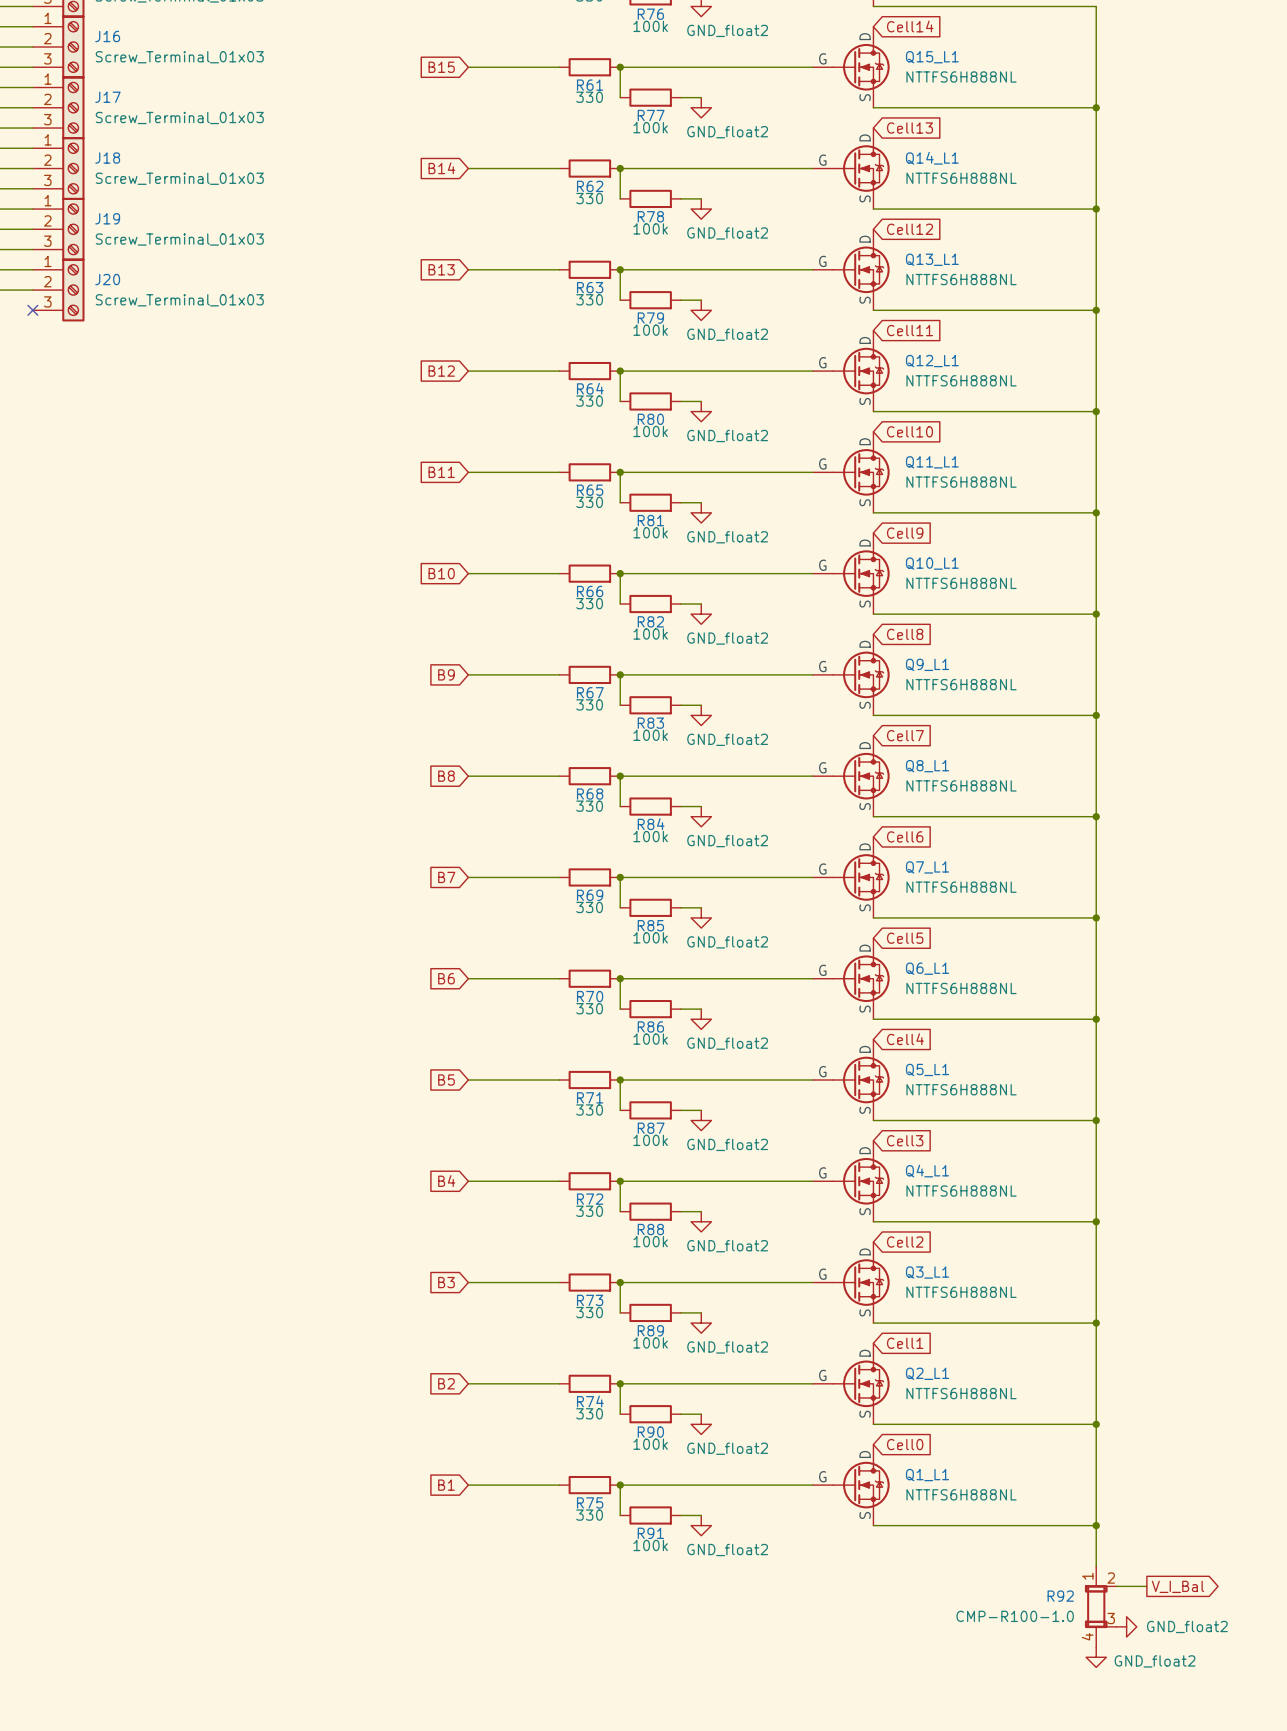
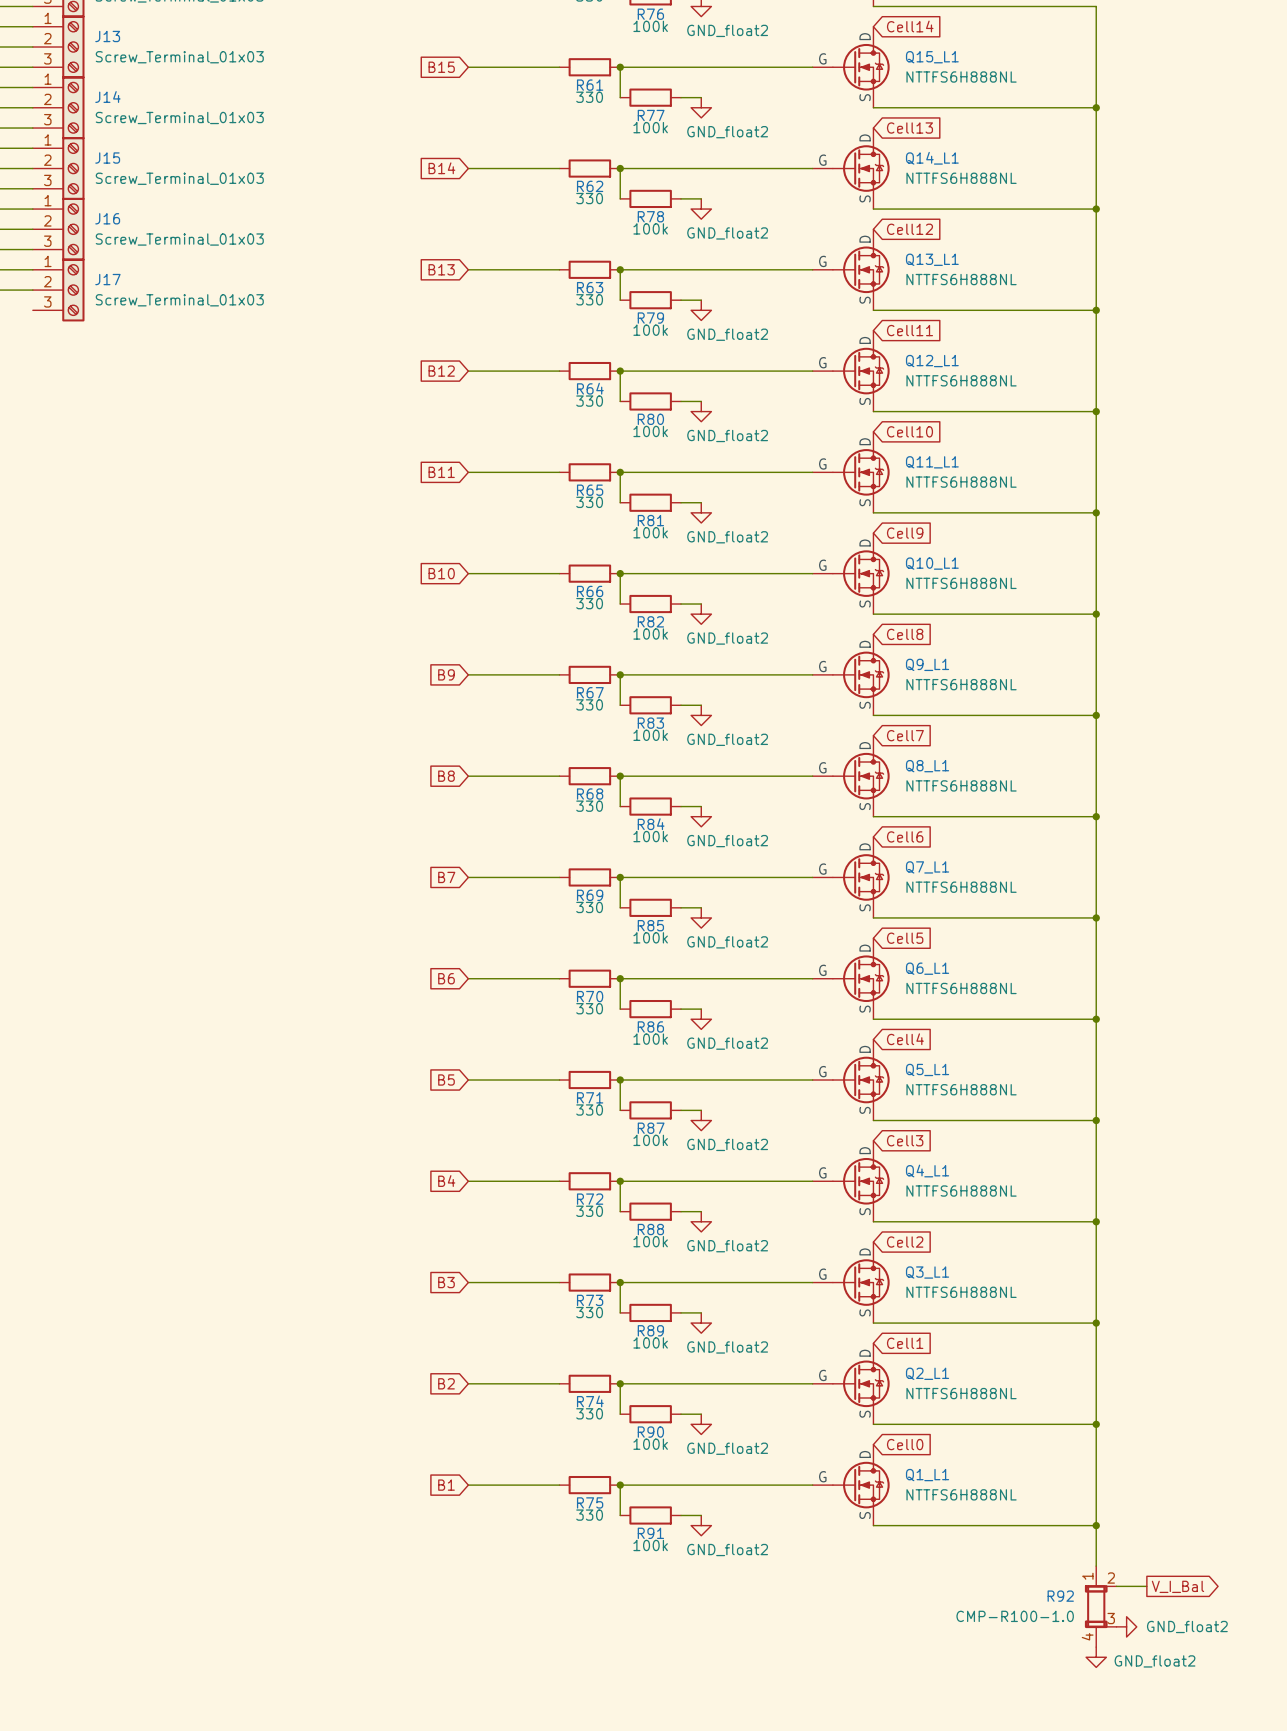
J16 name: J16 (107, 36) -> J13 (107, 36)
J17 name: J17 (107, 97) -> J14 (107, 97)
J18 name: J18 (107, 158) -> J15 (107, 158)
J19 name: J19 (107, 218) -> J16 (107, 218)
J20 name: J20 (107, 279) -> J17 (107, 279)
no-connect mark: (32, 310) -> none

